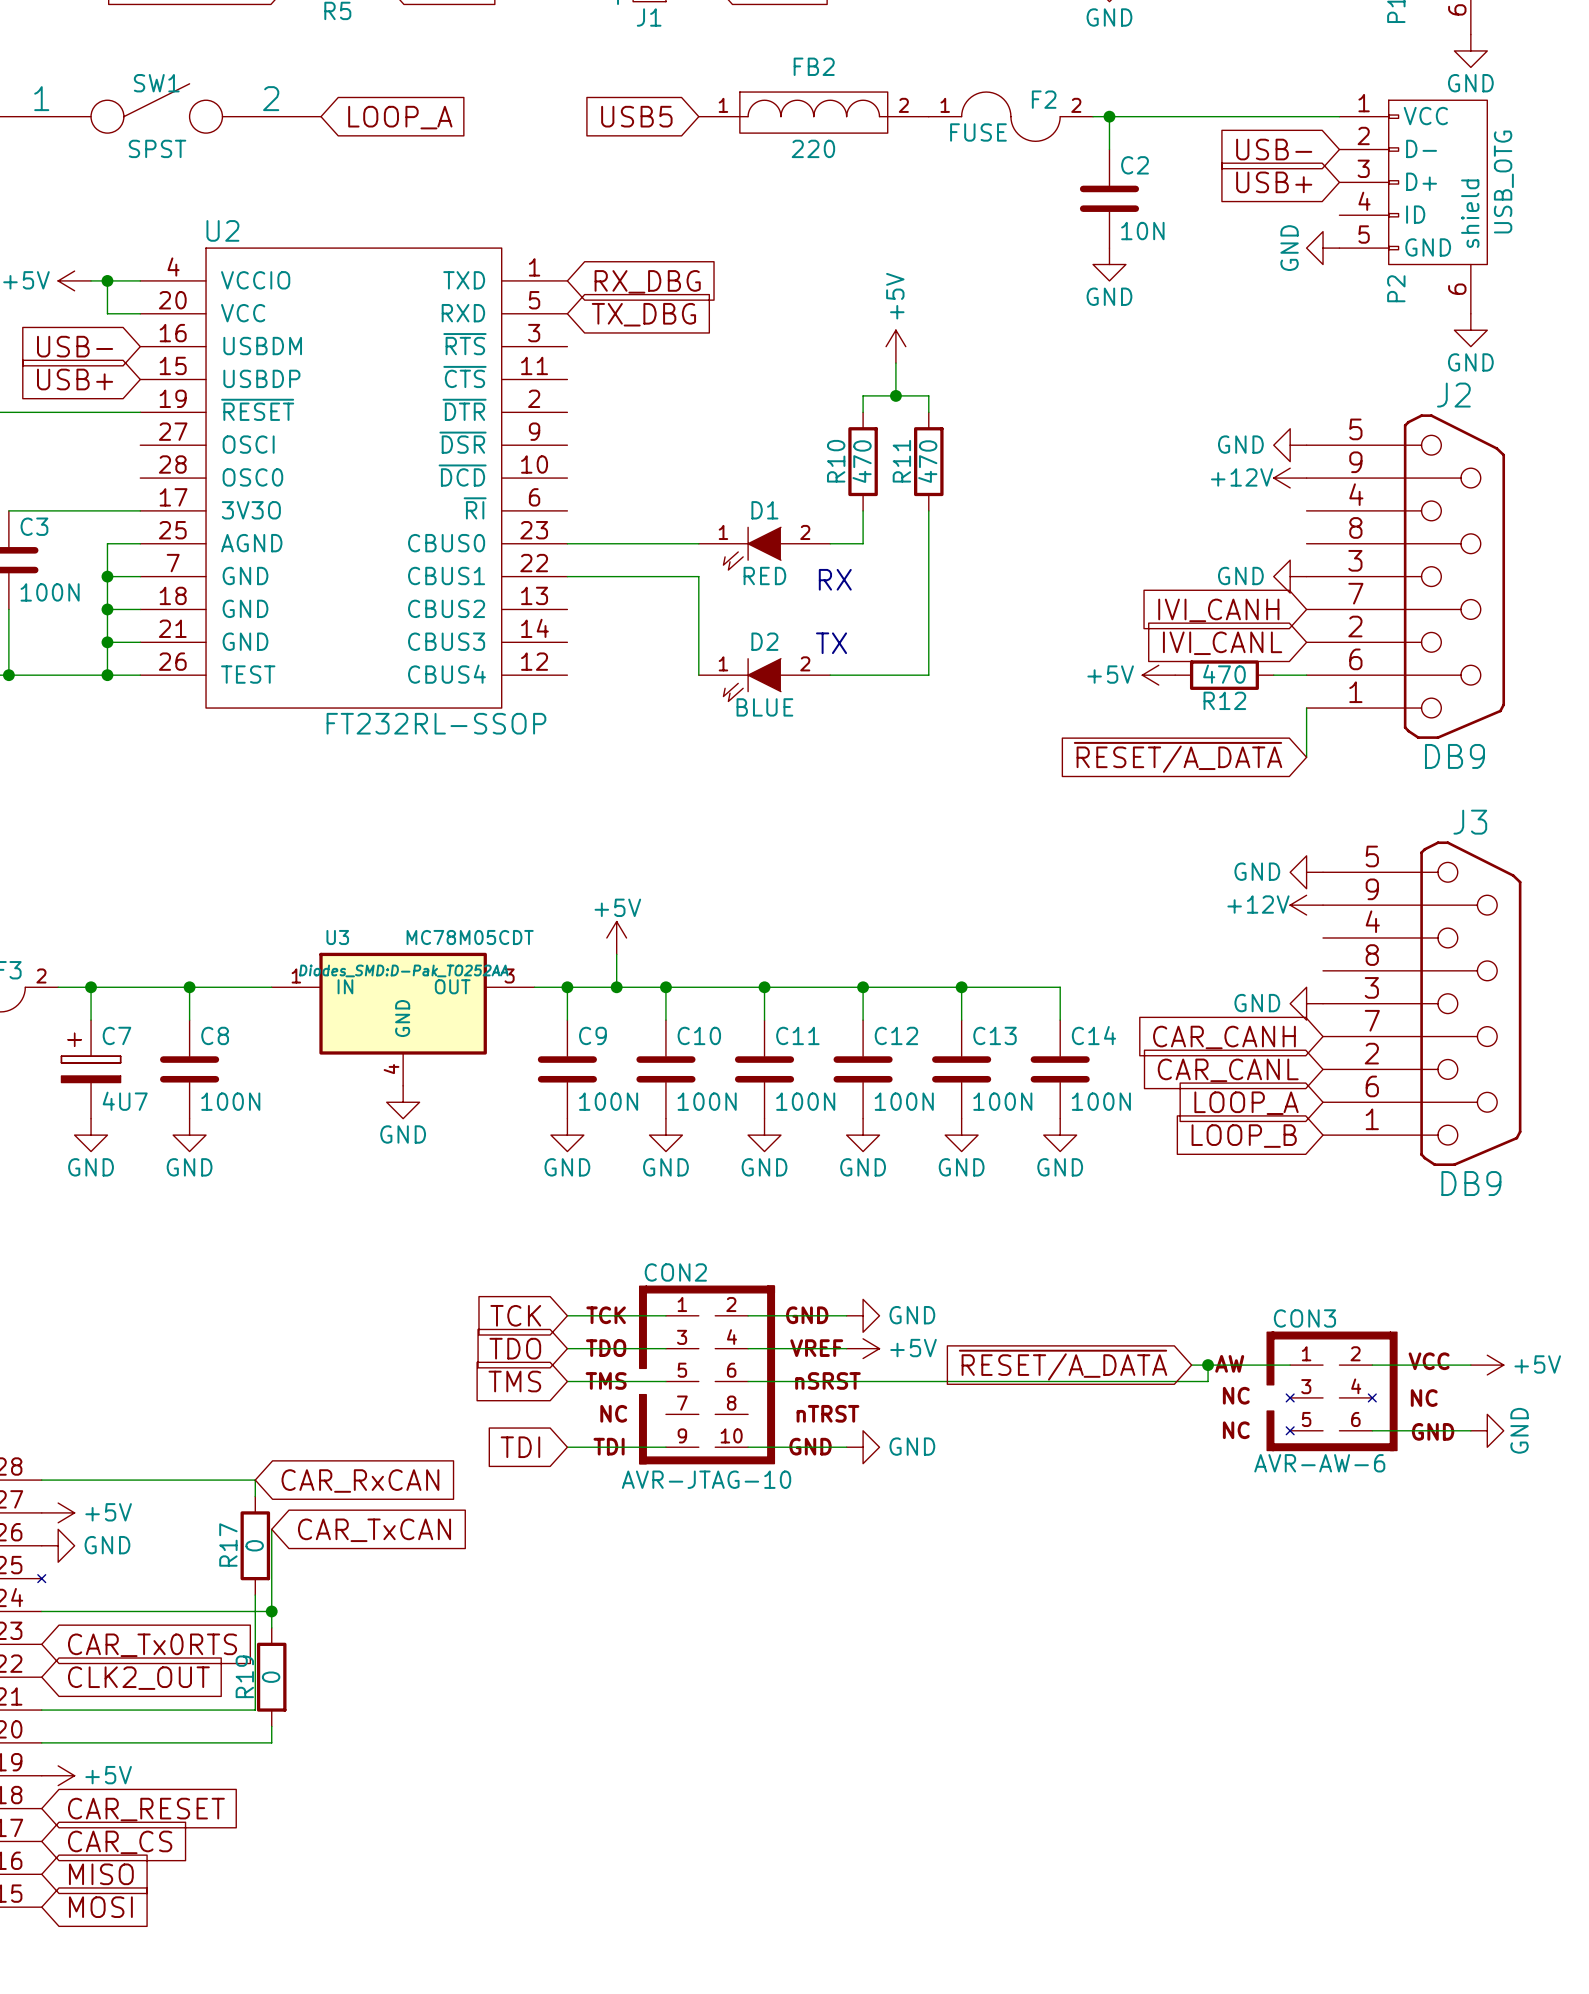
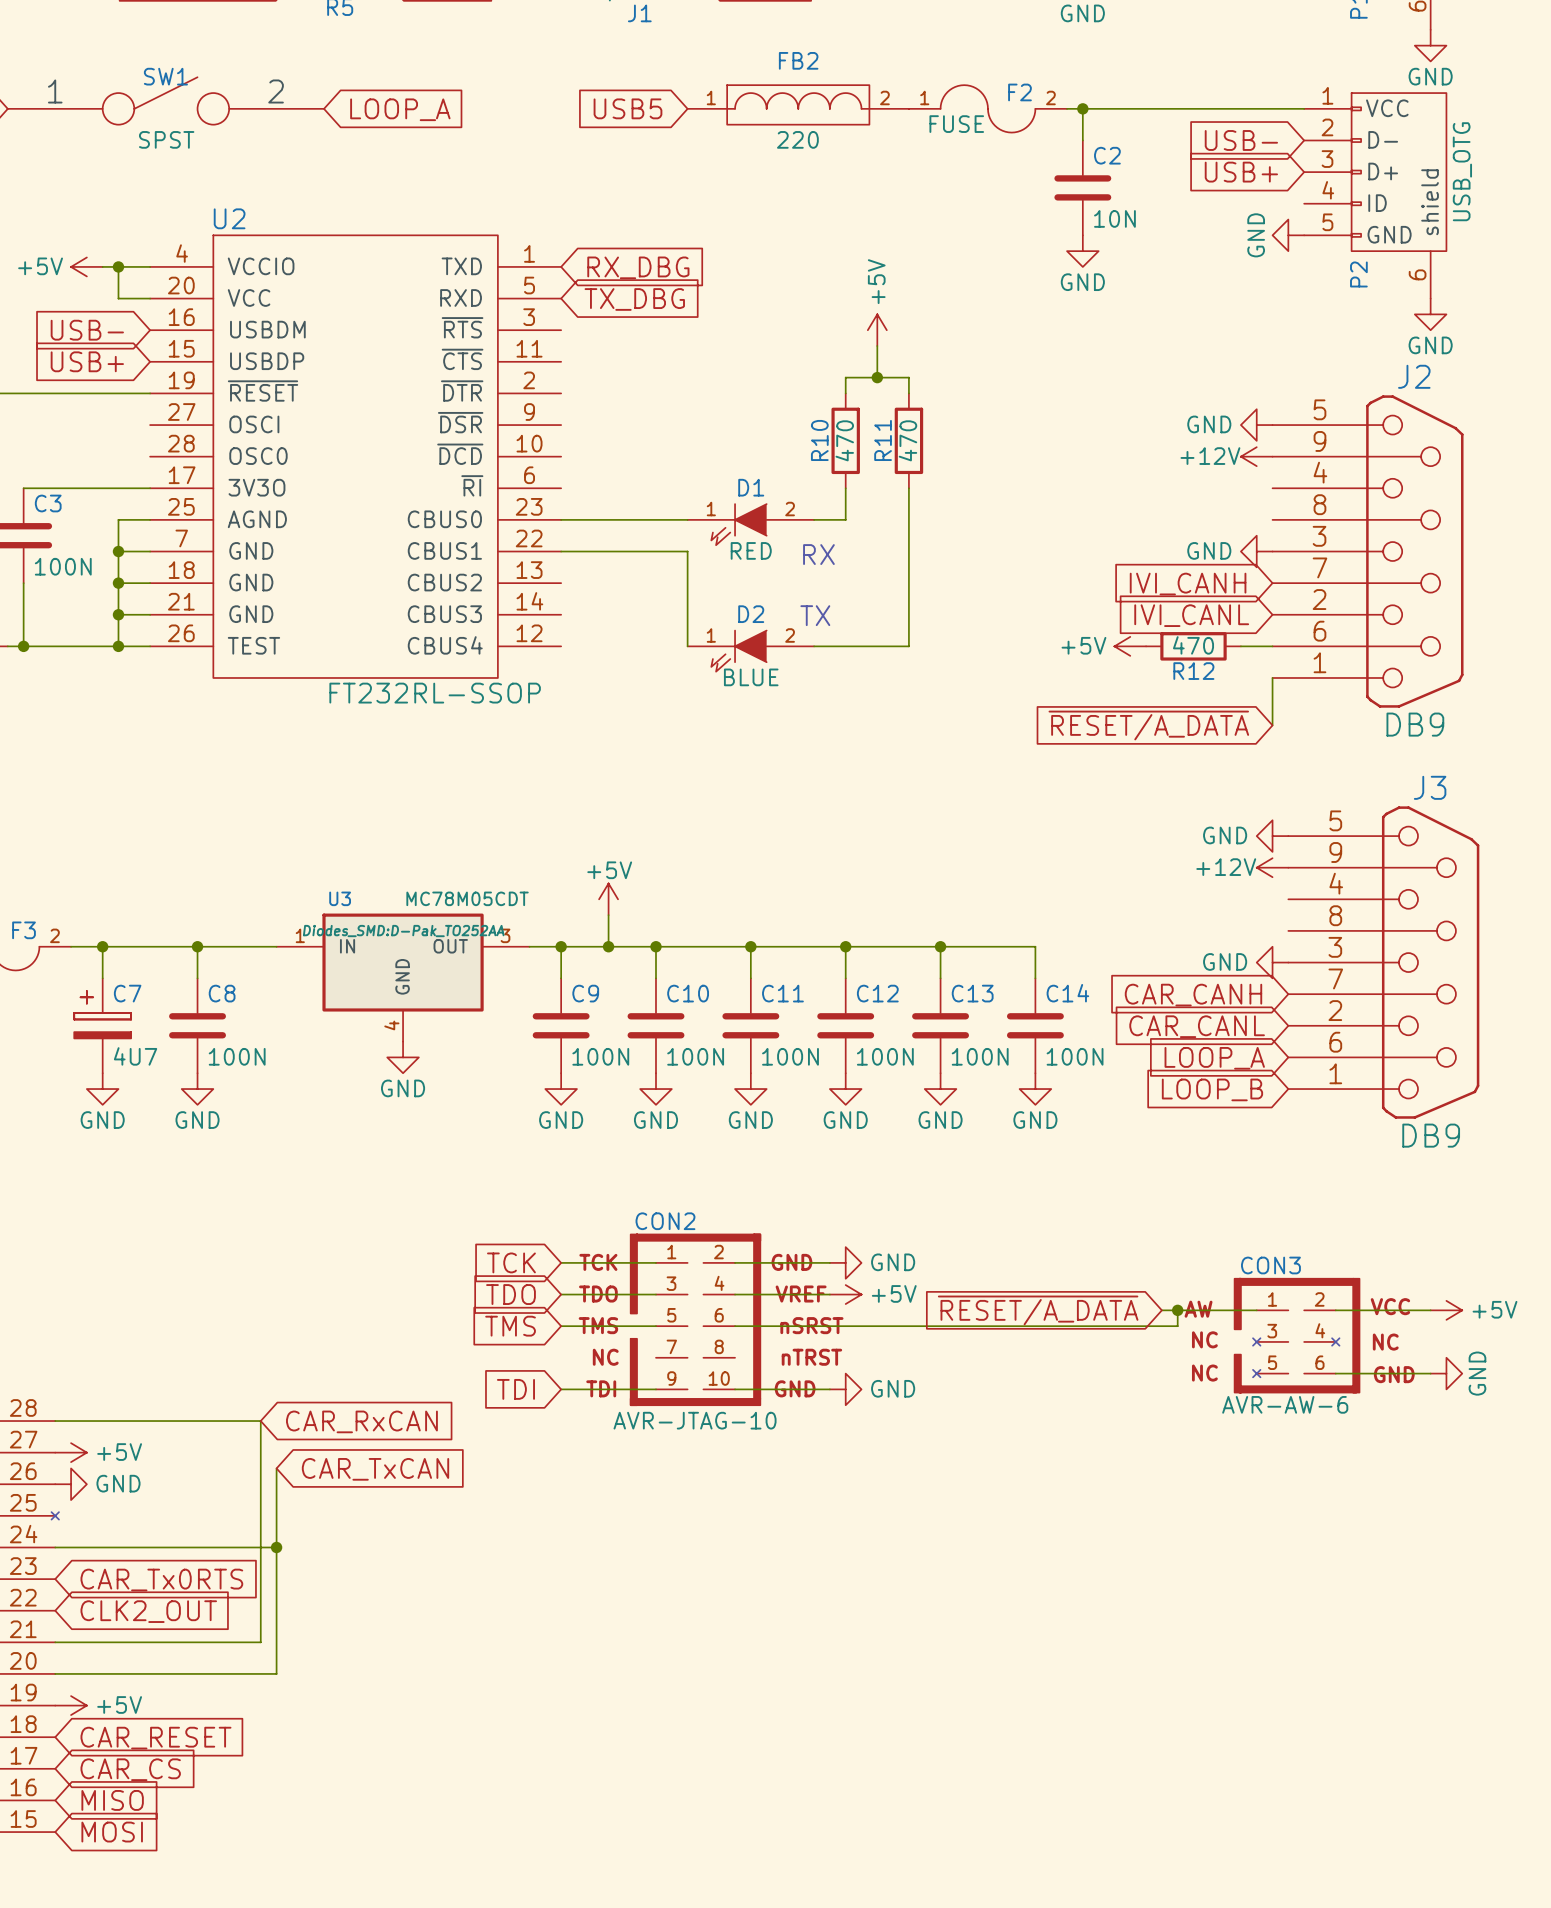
wire: none -> (260, 1436) (260, 1531)
R17: 0 (255, 1545) -> none
wire: none -> (276, 1563) (276, 1658)
R19: 0 (271, 1677) -> none

